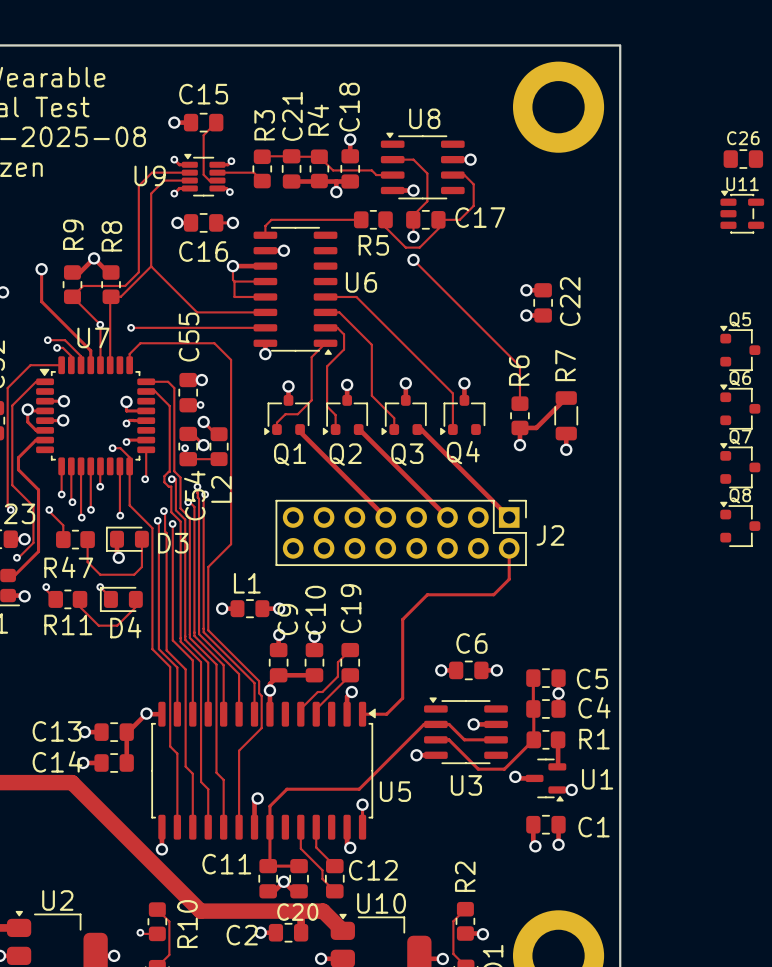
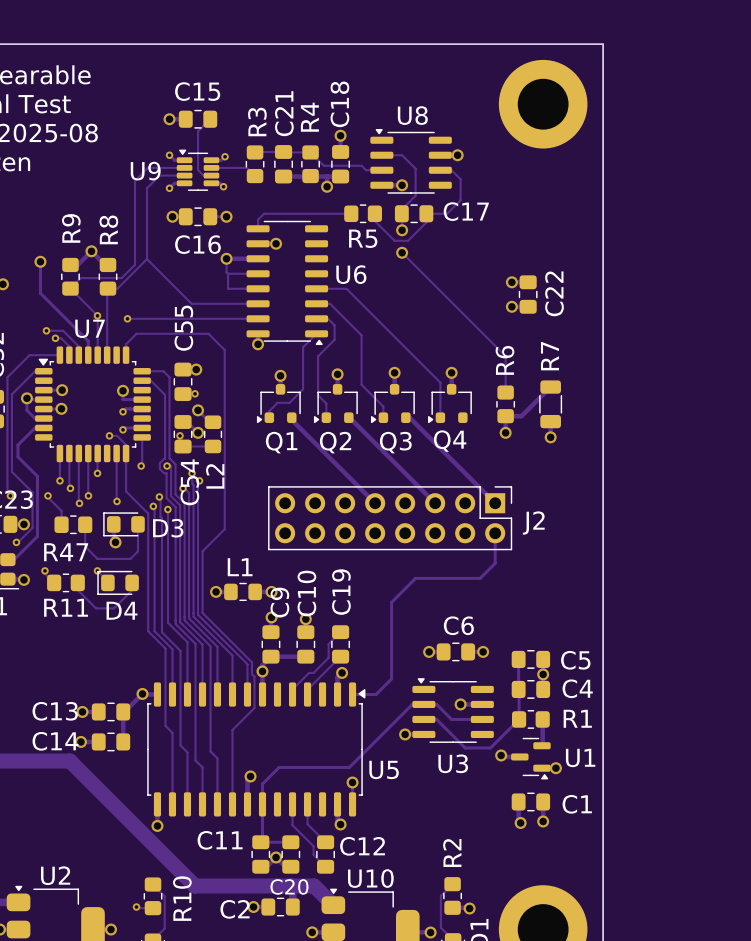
C26: (743, 159) -> none
U11: (742, 212) -> none
Q5: (740, 348) -> none
Q6: (740, 407) -> none
Q7: (740, 465) -> none
Q8: (740, 524) -> none

